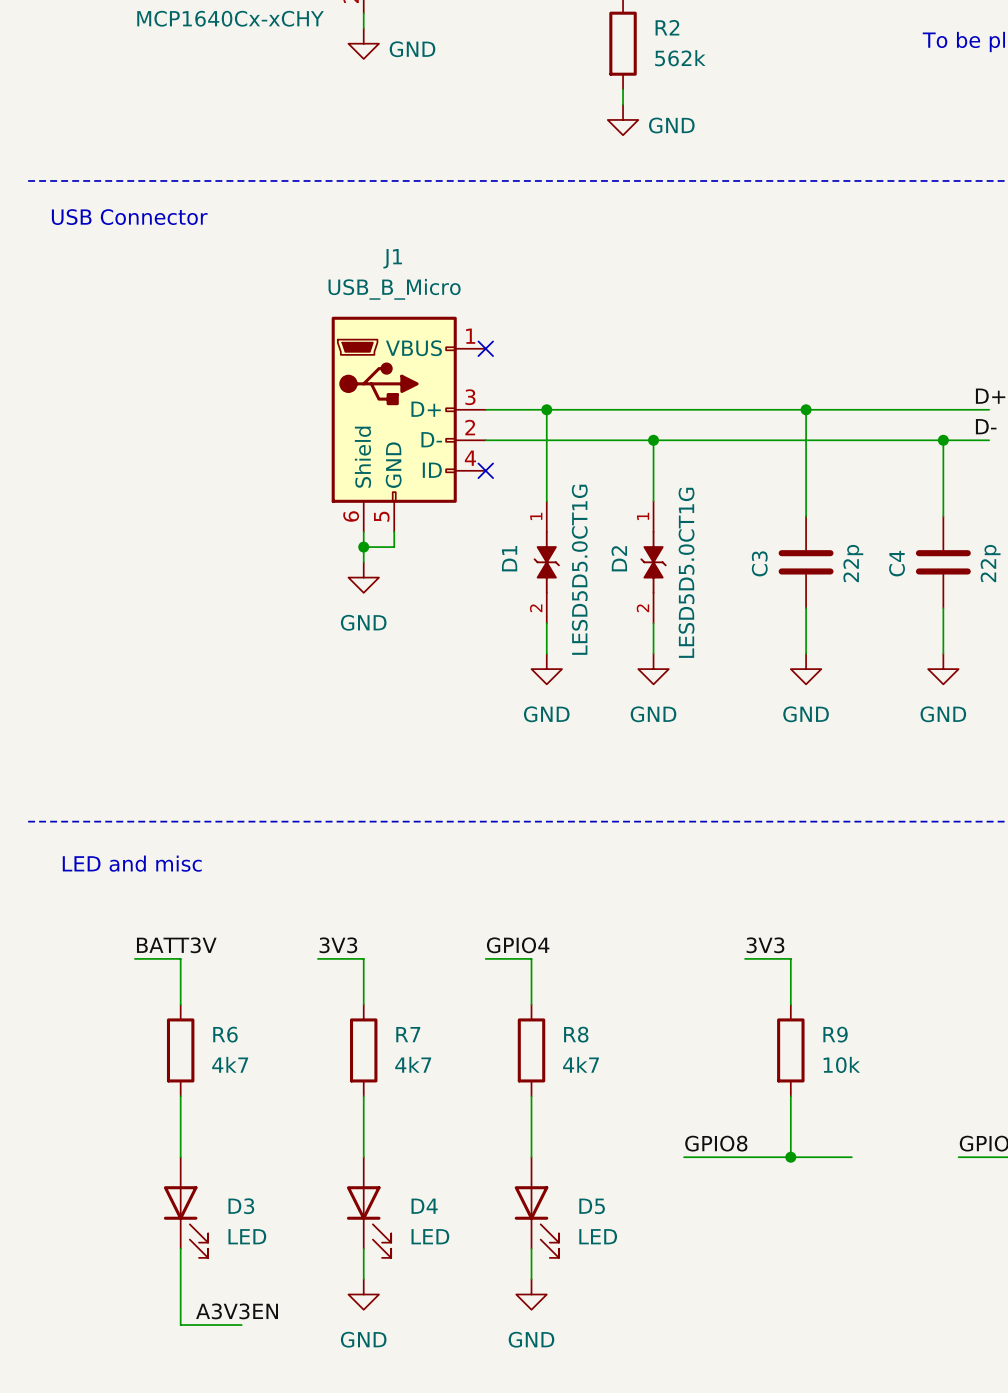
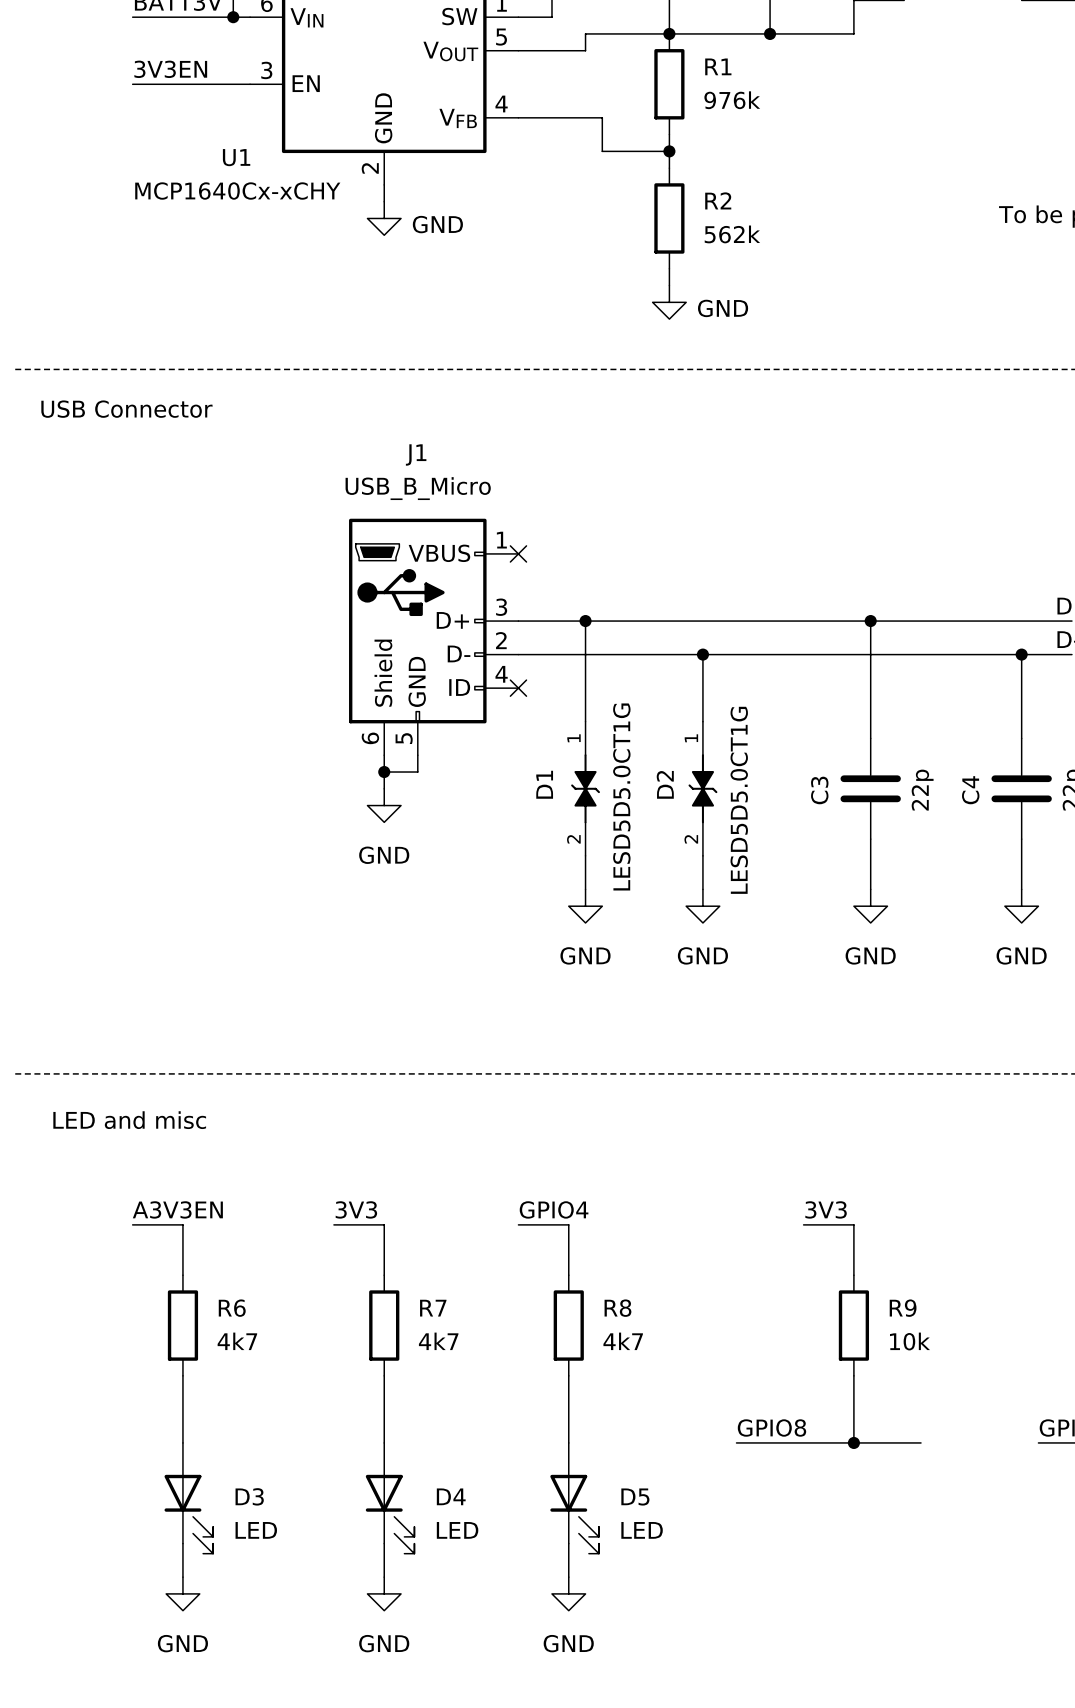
label: BATT3V (176, 945) -> A3V3EN (177, 1209)
wire: (180, 1279) (180, 1325) (241, 1325) -> none
power symbol: none -> GND (182, 1593)
label: A3V3EN (237, 1311) -> none

